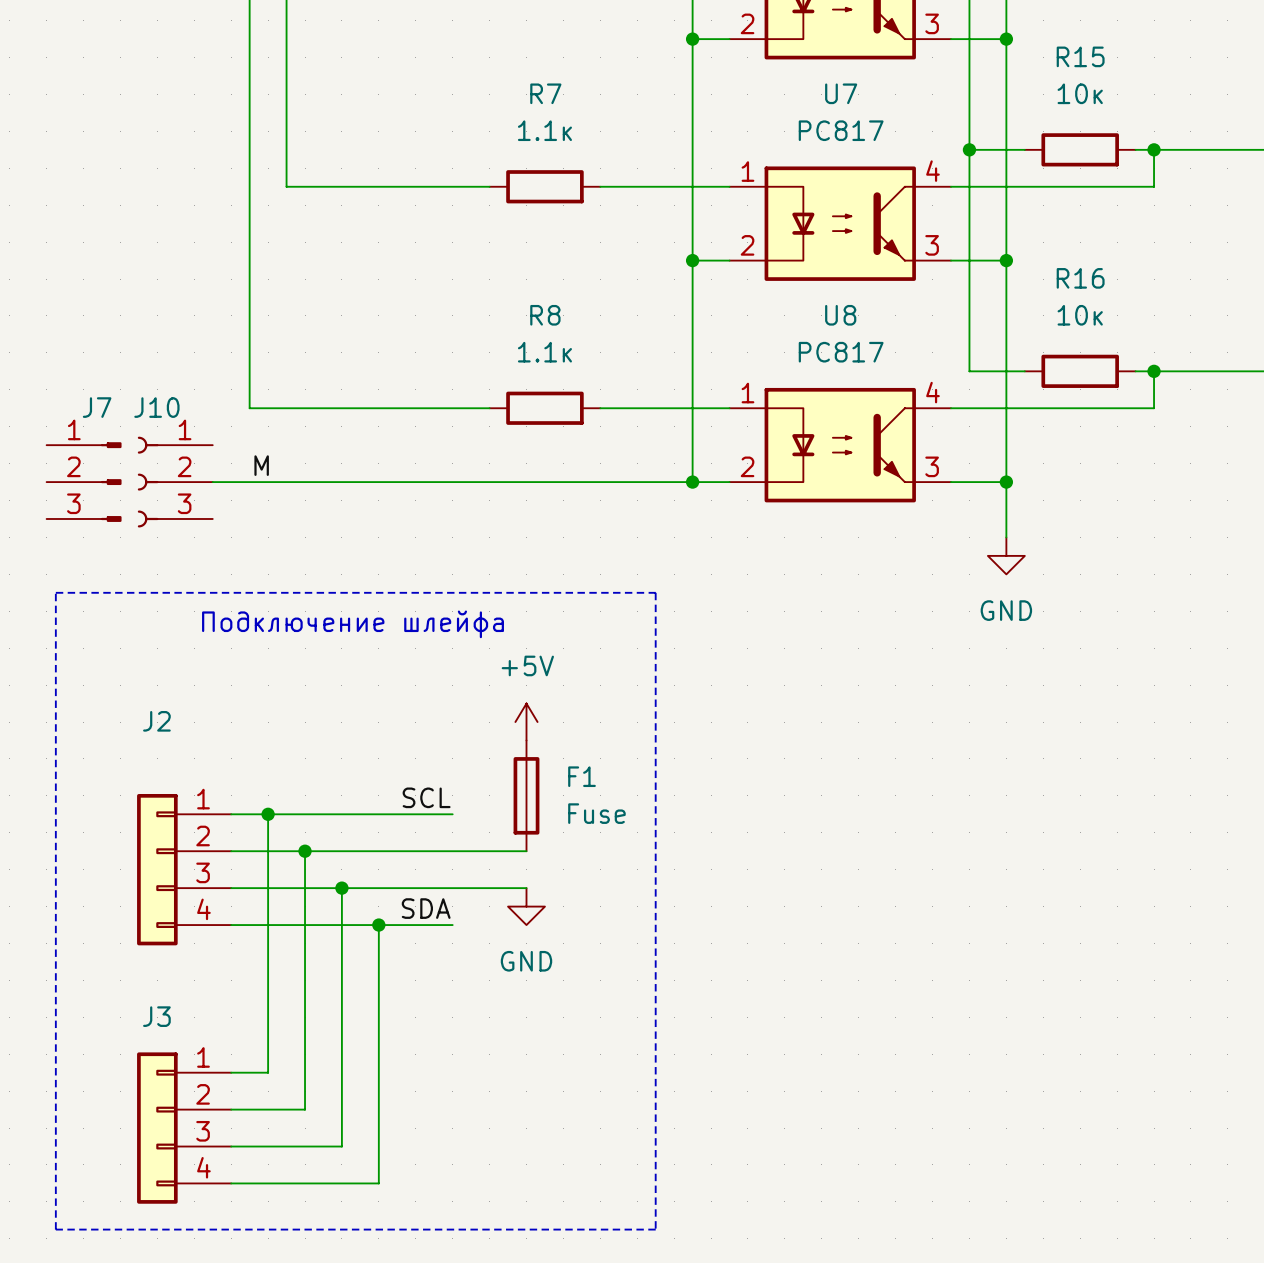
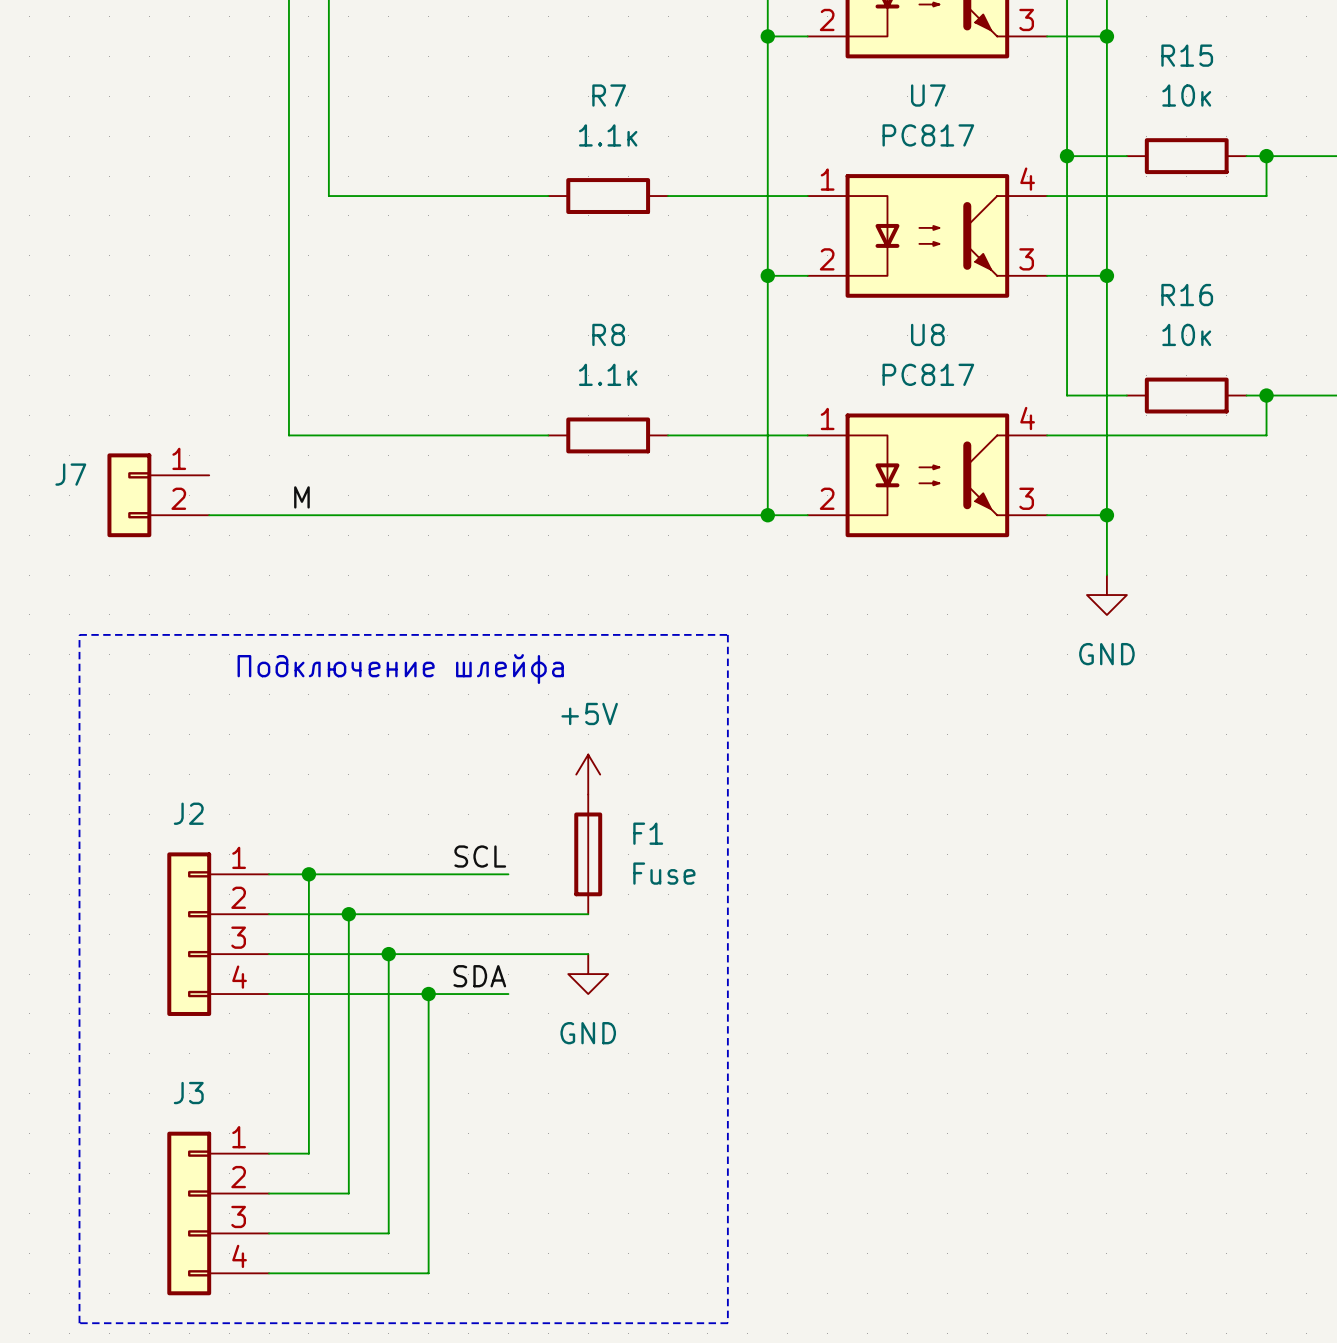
J7 name position: J7 (97, 407) -> J7 (70, 474)
J7 symbol: [46, 442, 122, 522] -> [107, 453, 210, 538]
J10: (175, 482) -> none
J2 name position: J2 (156, 721) -> J2 (188, 813)

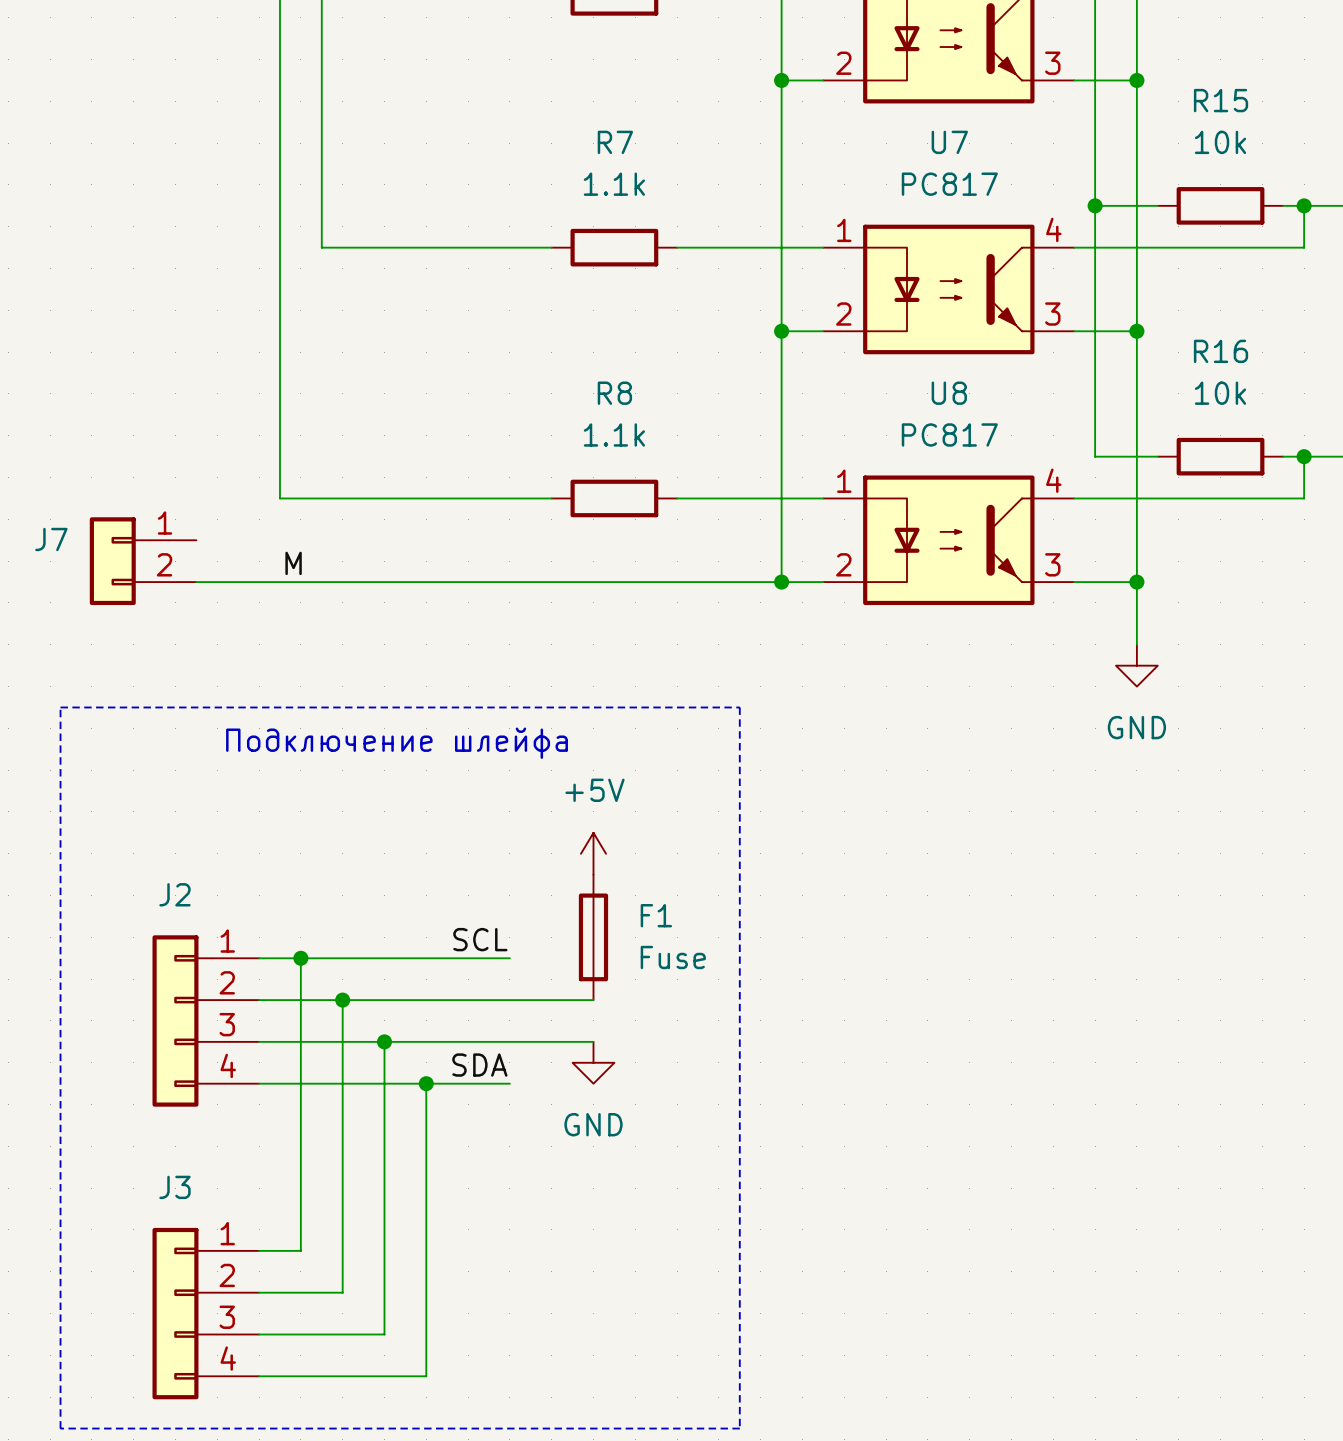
R15 value: 10к (1186, 95) -> 10k (1220, 142)
R7 value: 1.1к (608, 135) -> 1.1k (614, 184)
R16 value: 10к (1186, 334) -> 10k (1220, 393)
R8 value: 1.1к (608, 374) -> 1.1k (614, 434)

